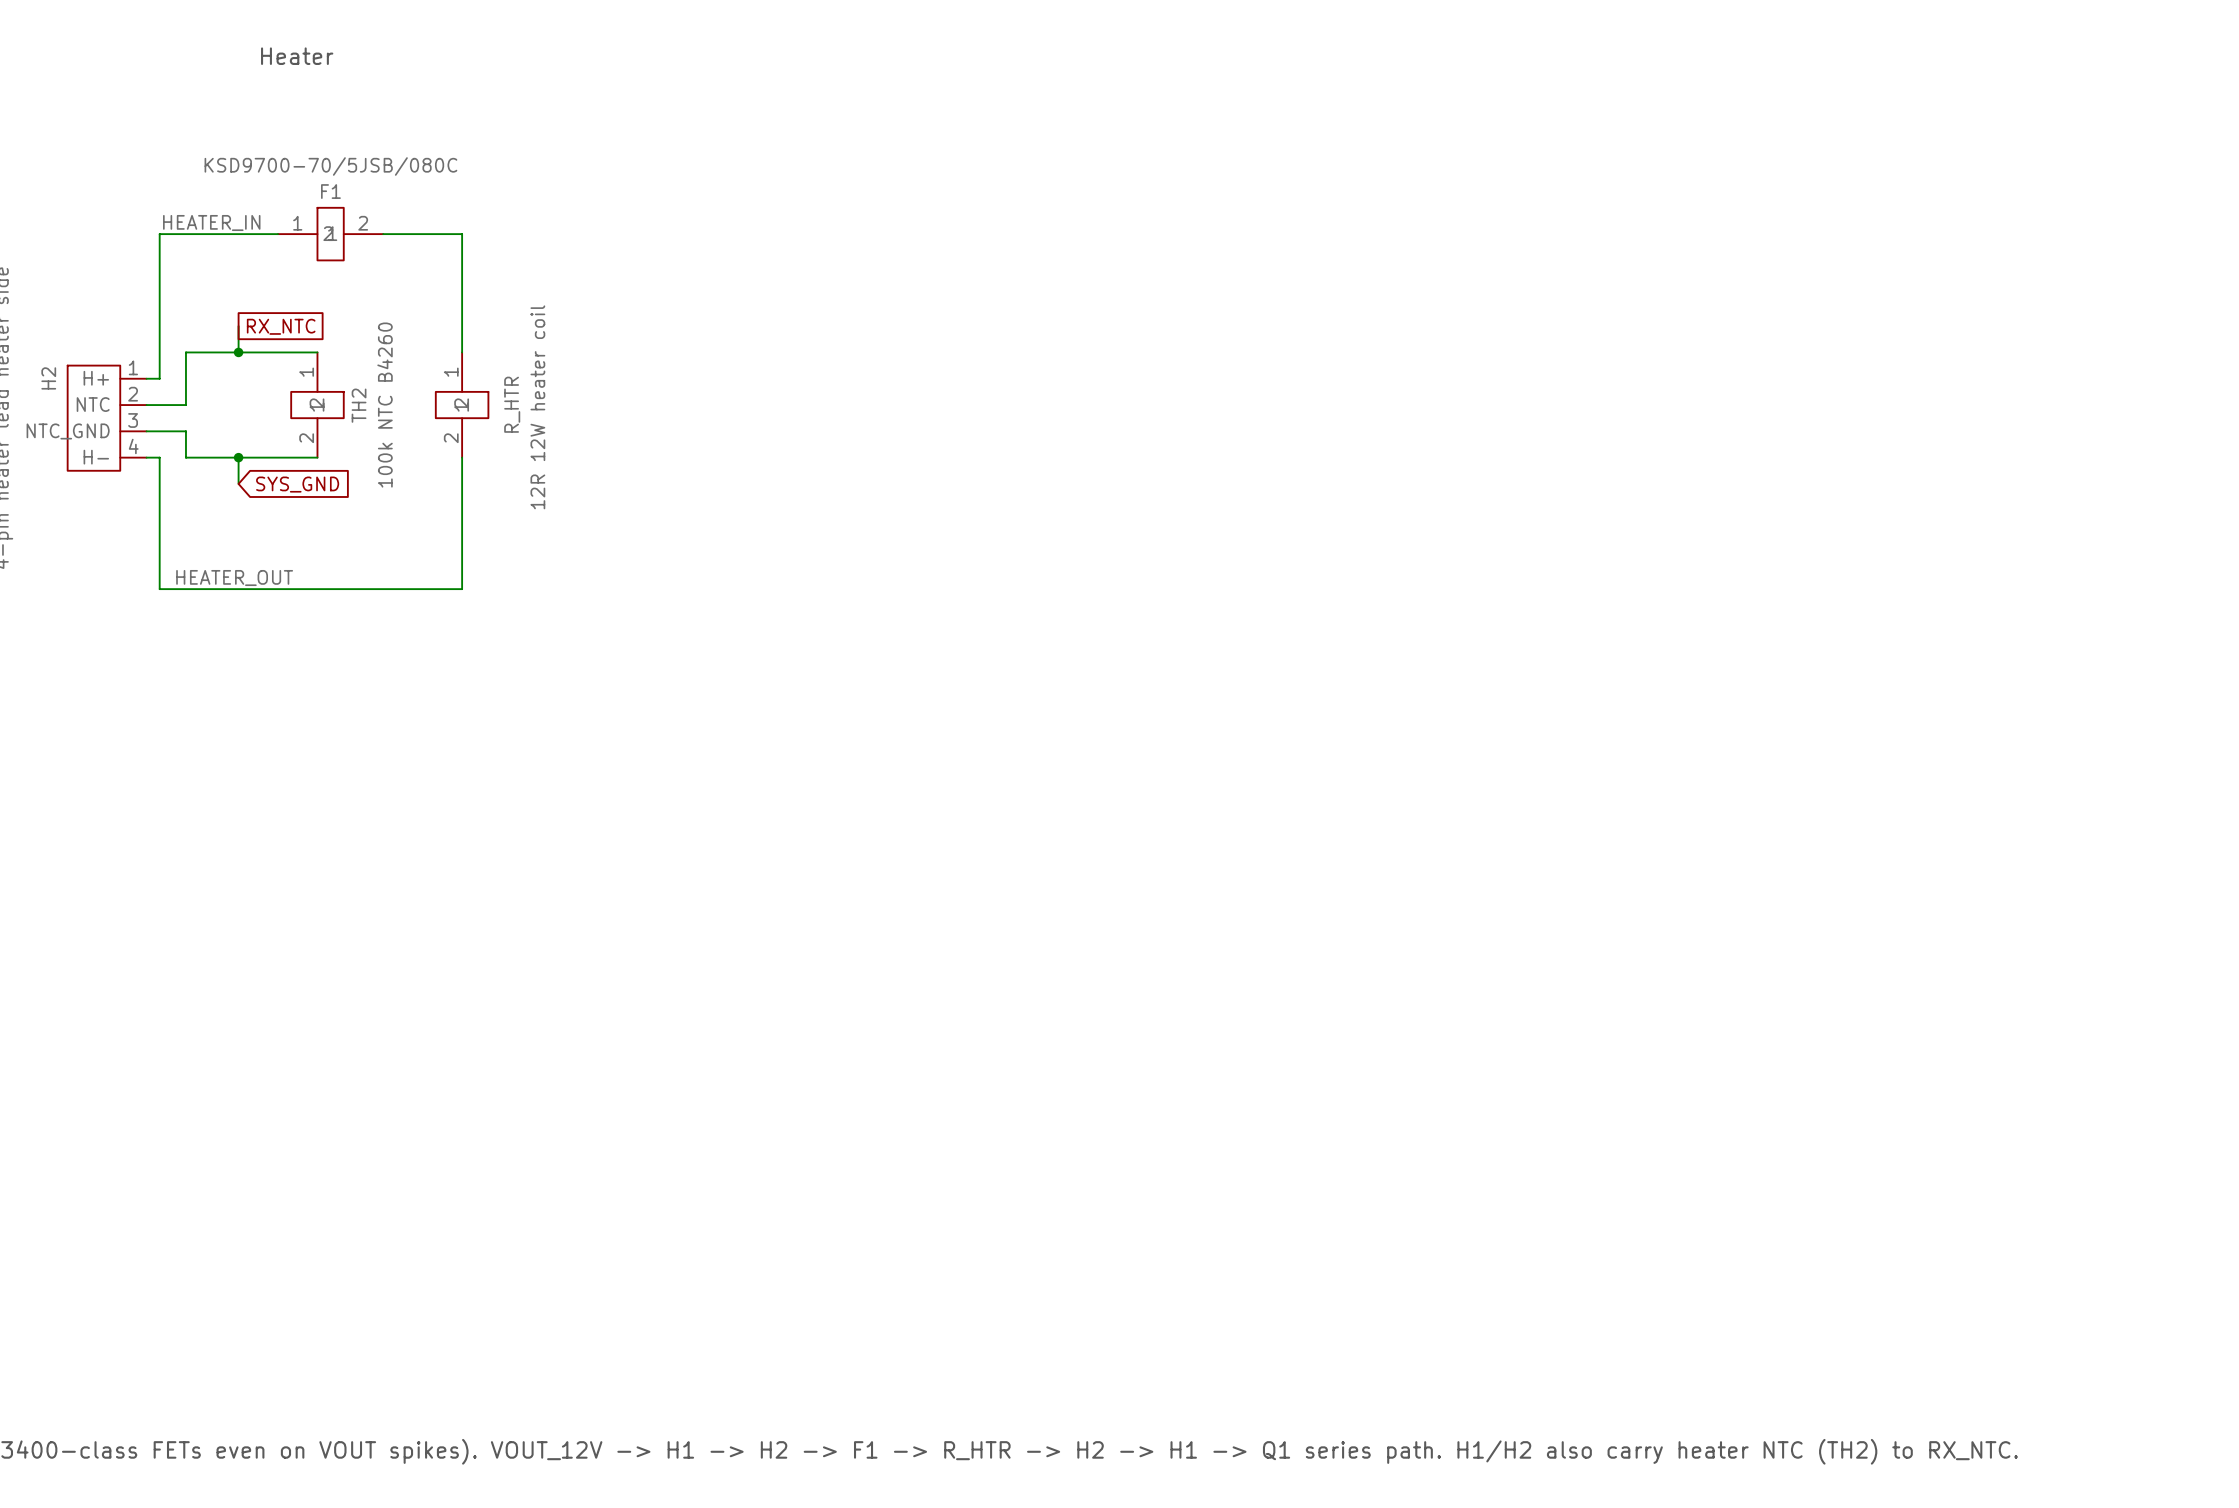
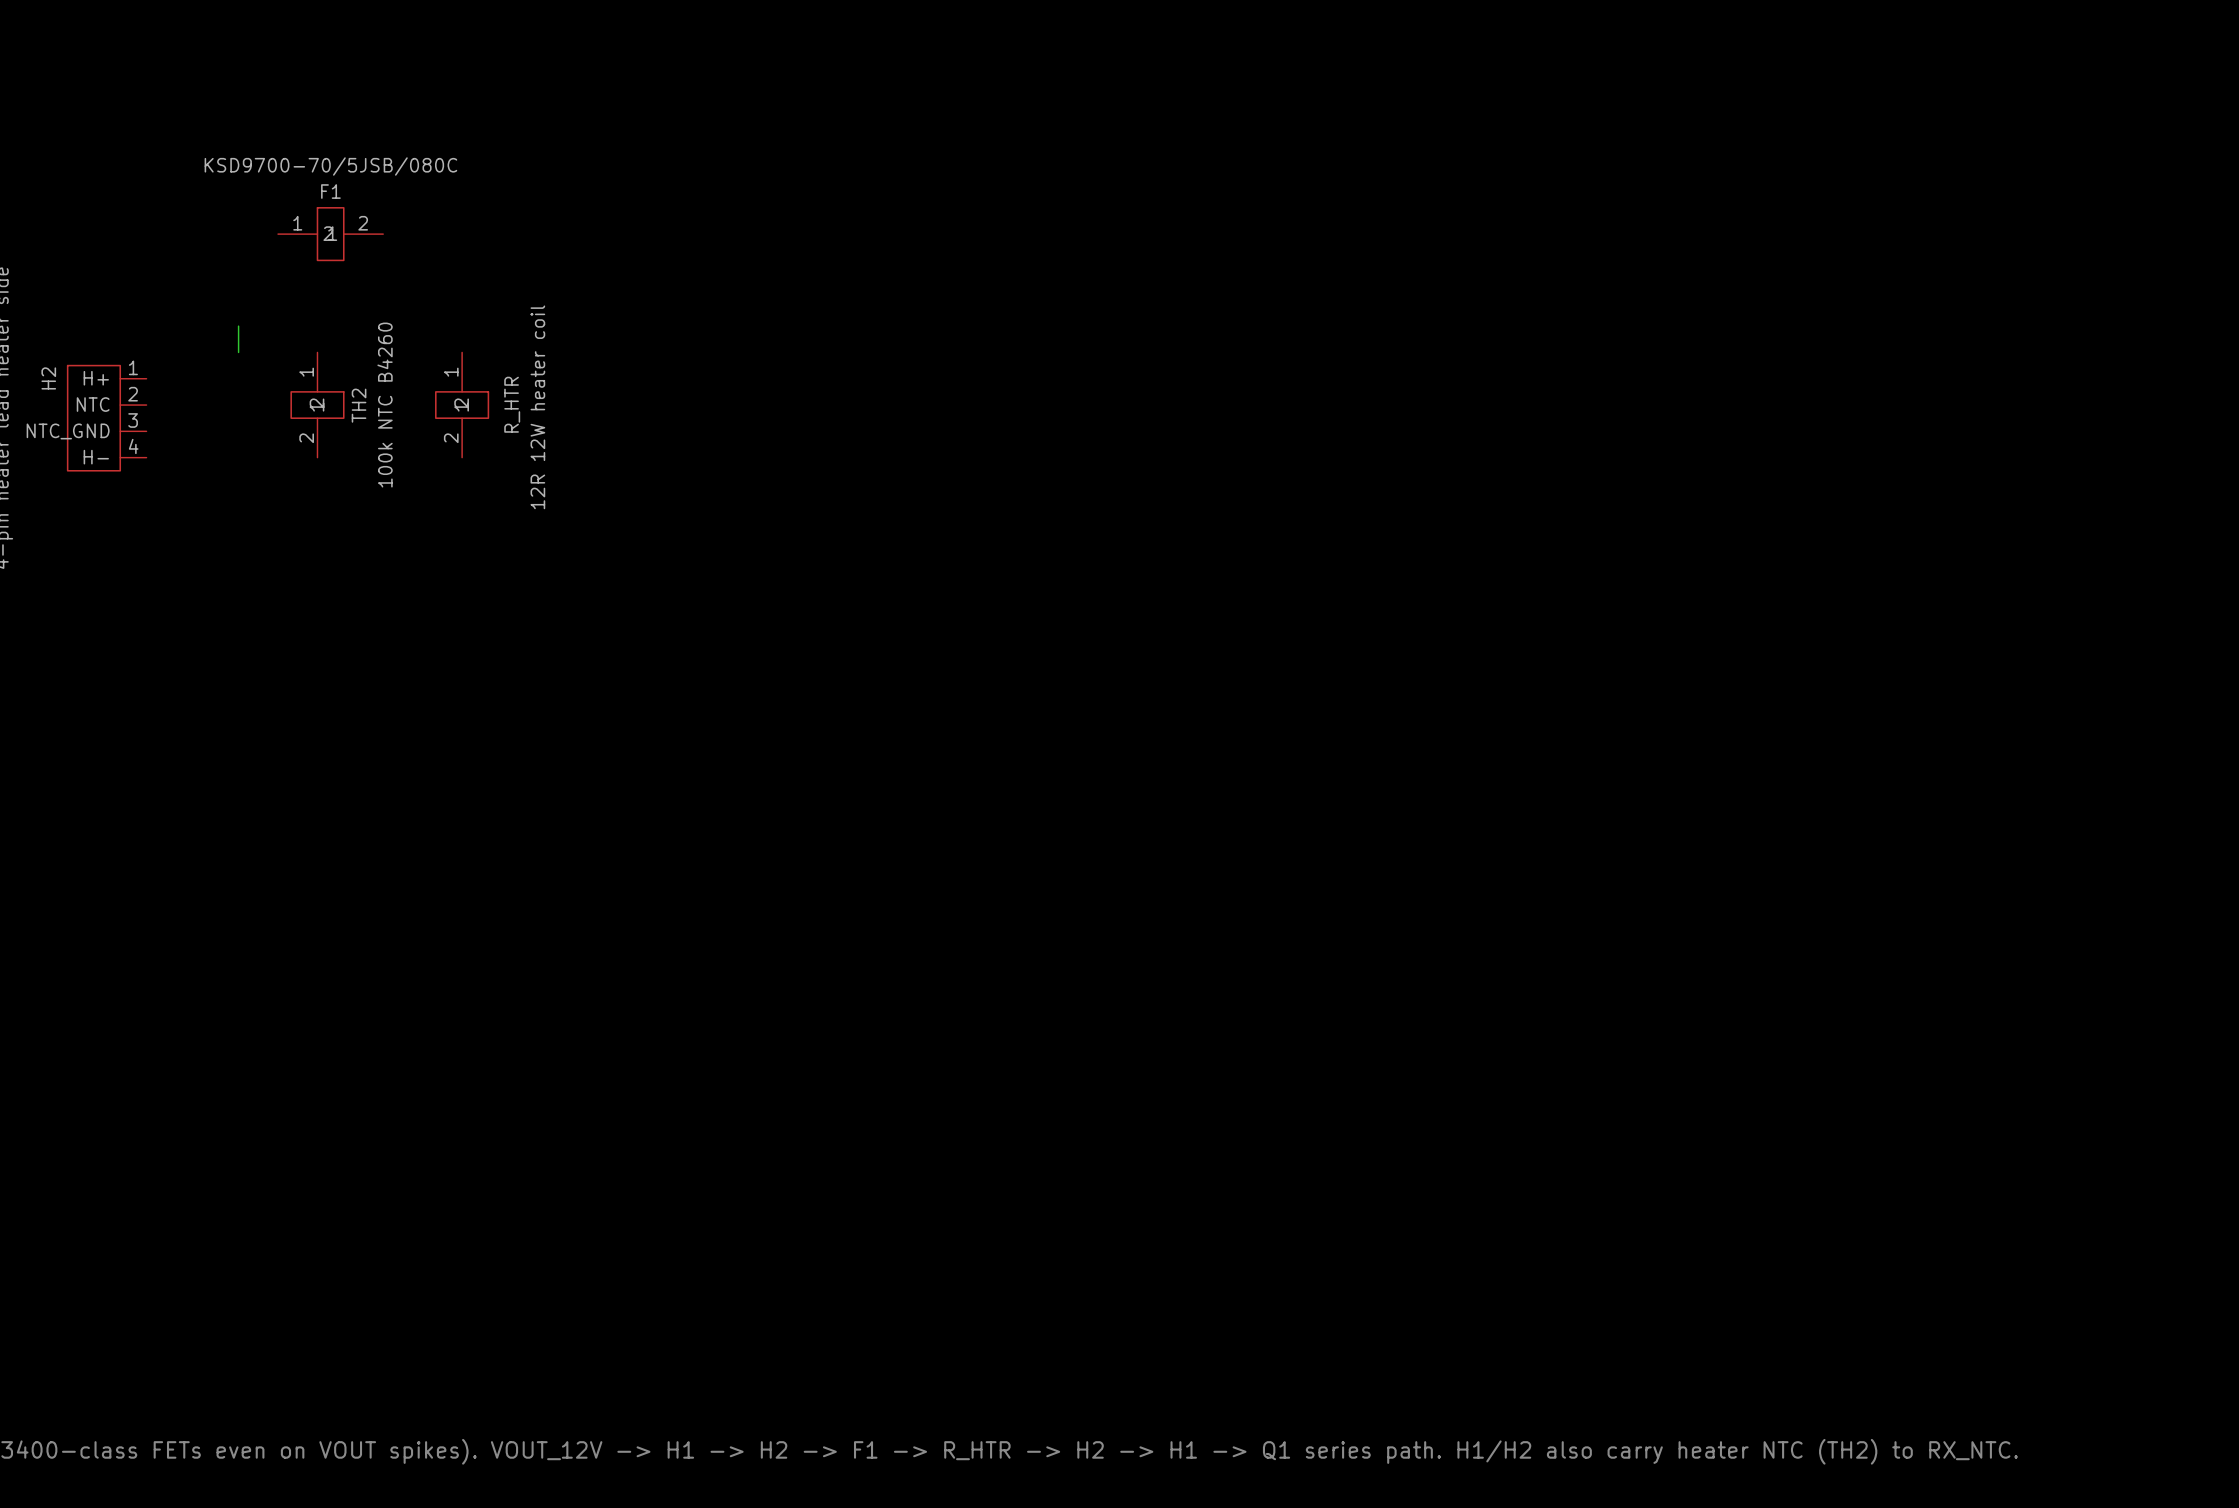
text: Heater (297, 56) -> none
label: HEATER_IN (211, 223) -> none
wire: (278, 234) (159, 234) (159, 378) (146, 378) -> none
wire: (383, 234) (462, 234) (462, 352) -> none
global label: RX_NTC (281, 326) -> none
junction: (238, 352) -> none
wire: (317, 352) (185, 352) (185, 405) (146, 405) -> none
wire: (146, 431) (185, 431) (185, 457) (317, 457) -> none
wire: (146, 457) (159, 457) (159, 589) (462, 589) (462, 457) -> none
wire: (238, 457) (238, 483) -> none
junction: (238, 457) -> none
global label: SYS_GND (297, 484) -> none
label: HEATER_OUT (234, 578) -> none

